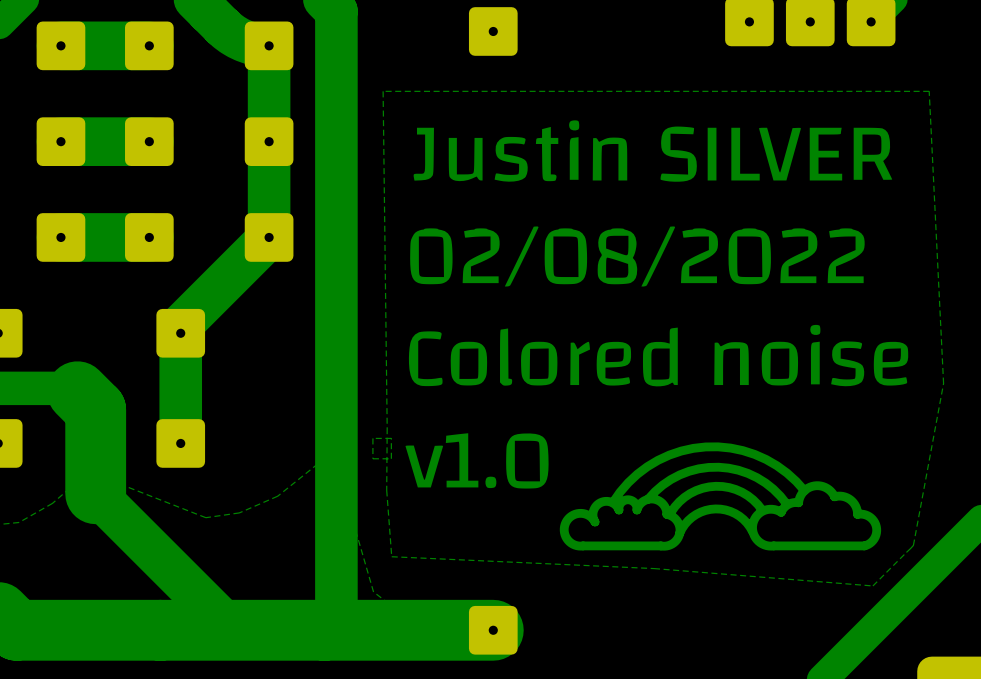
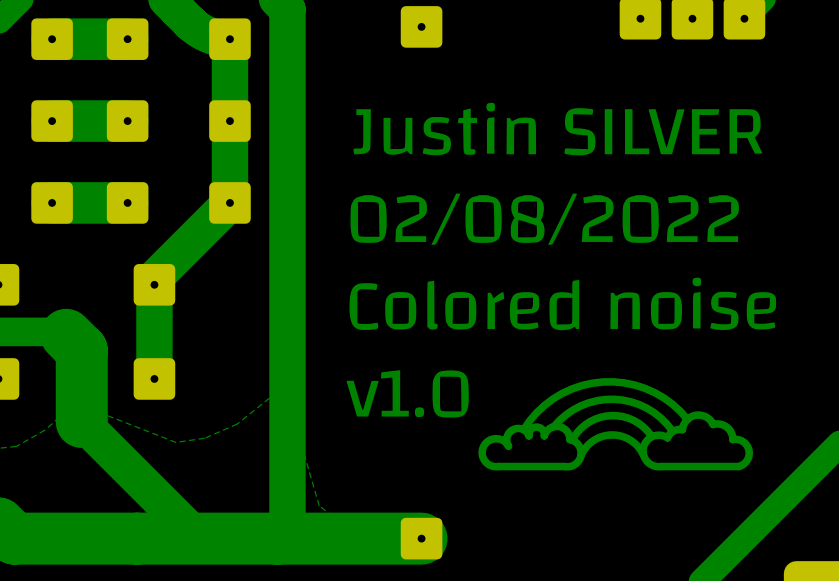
zone outline: (929, 91) (943, 383) (913, 545) (872, 585) (654, 568) (391, 556) (386, 490) (383, 91) (929, 91) -> none
zone outline: (391, 438) (391, 458) (372, 458) (372, 438) (391, 438) -> none

